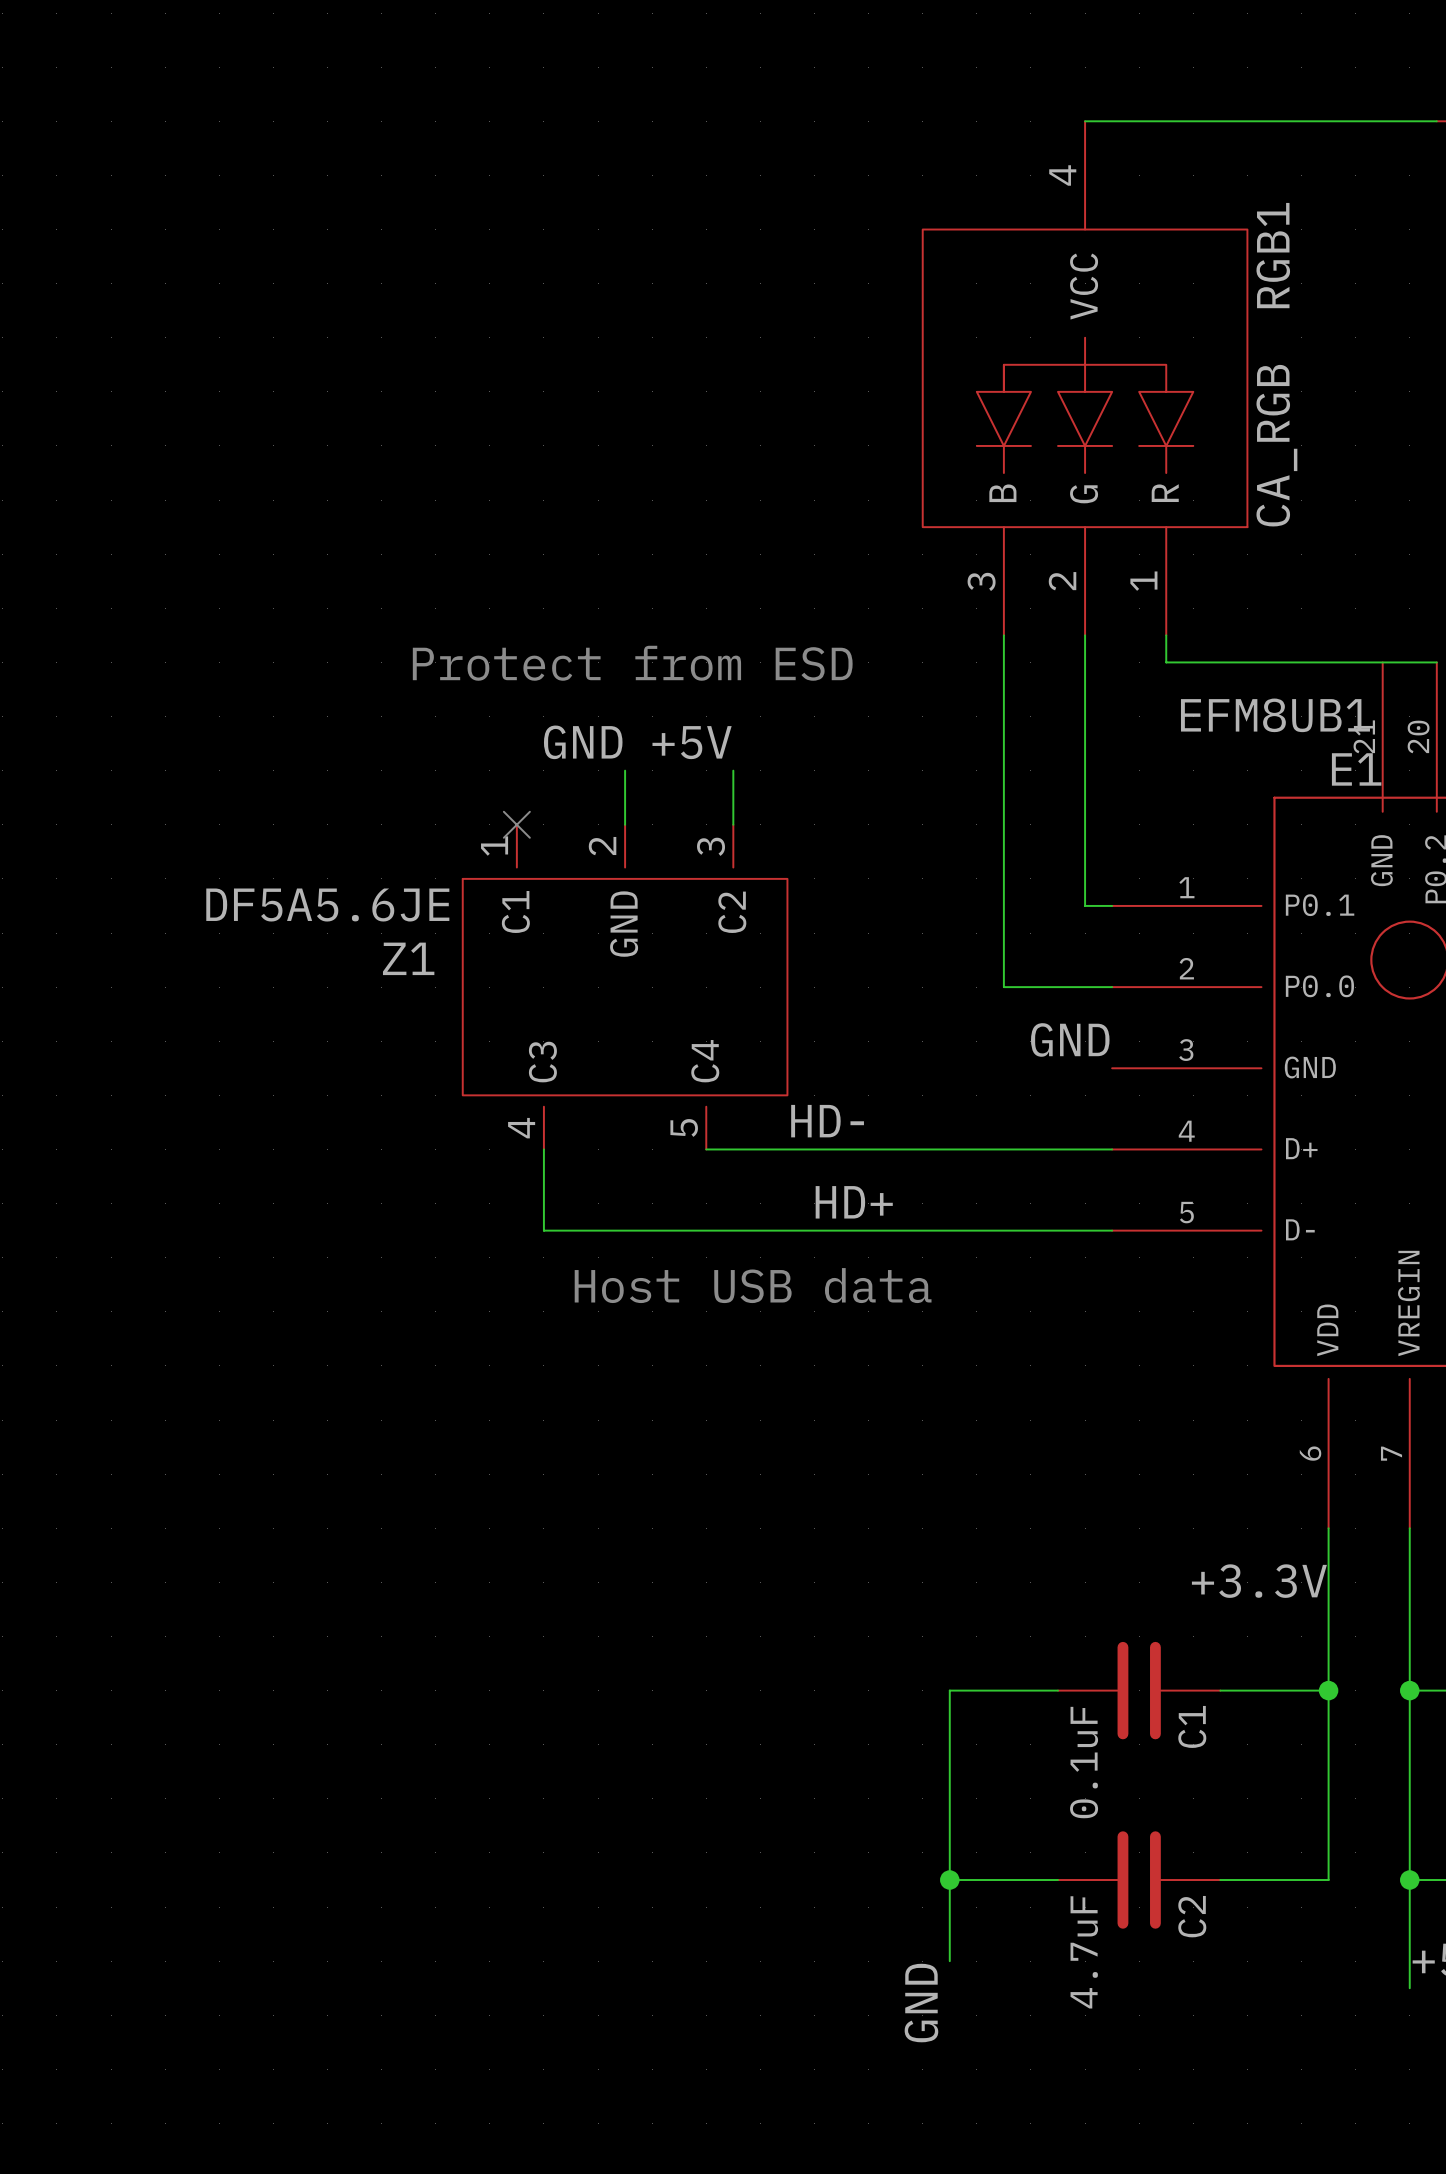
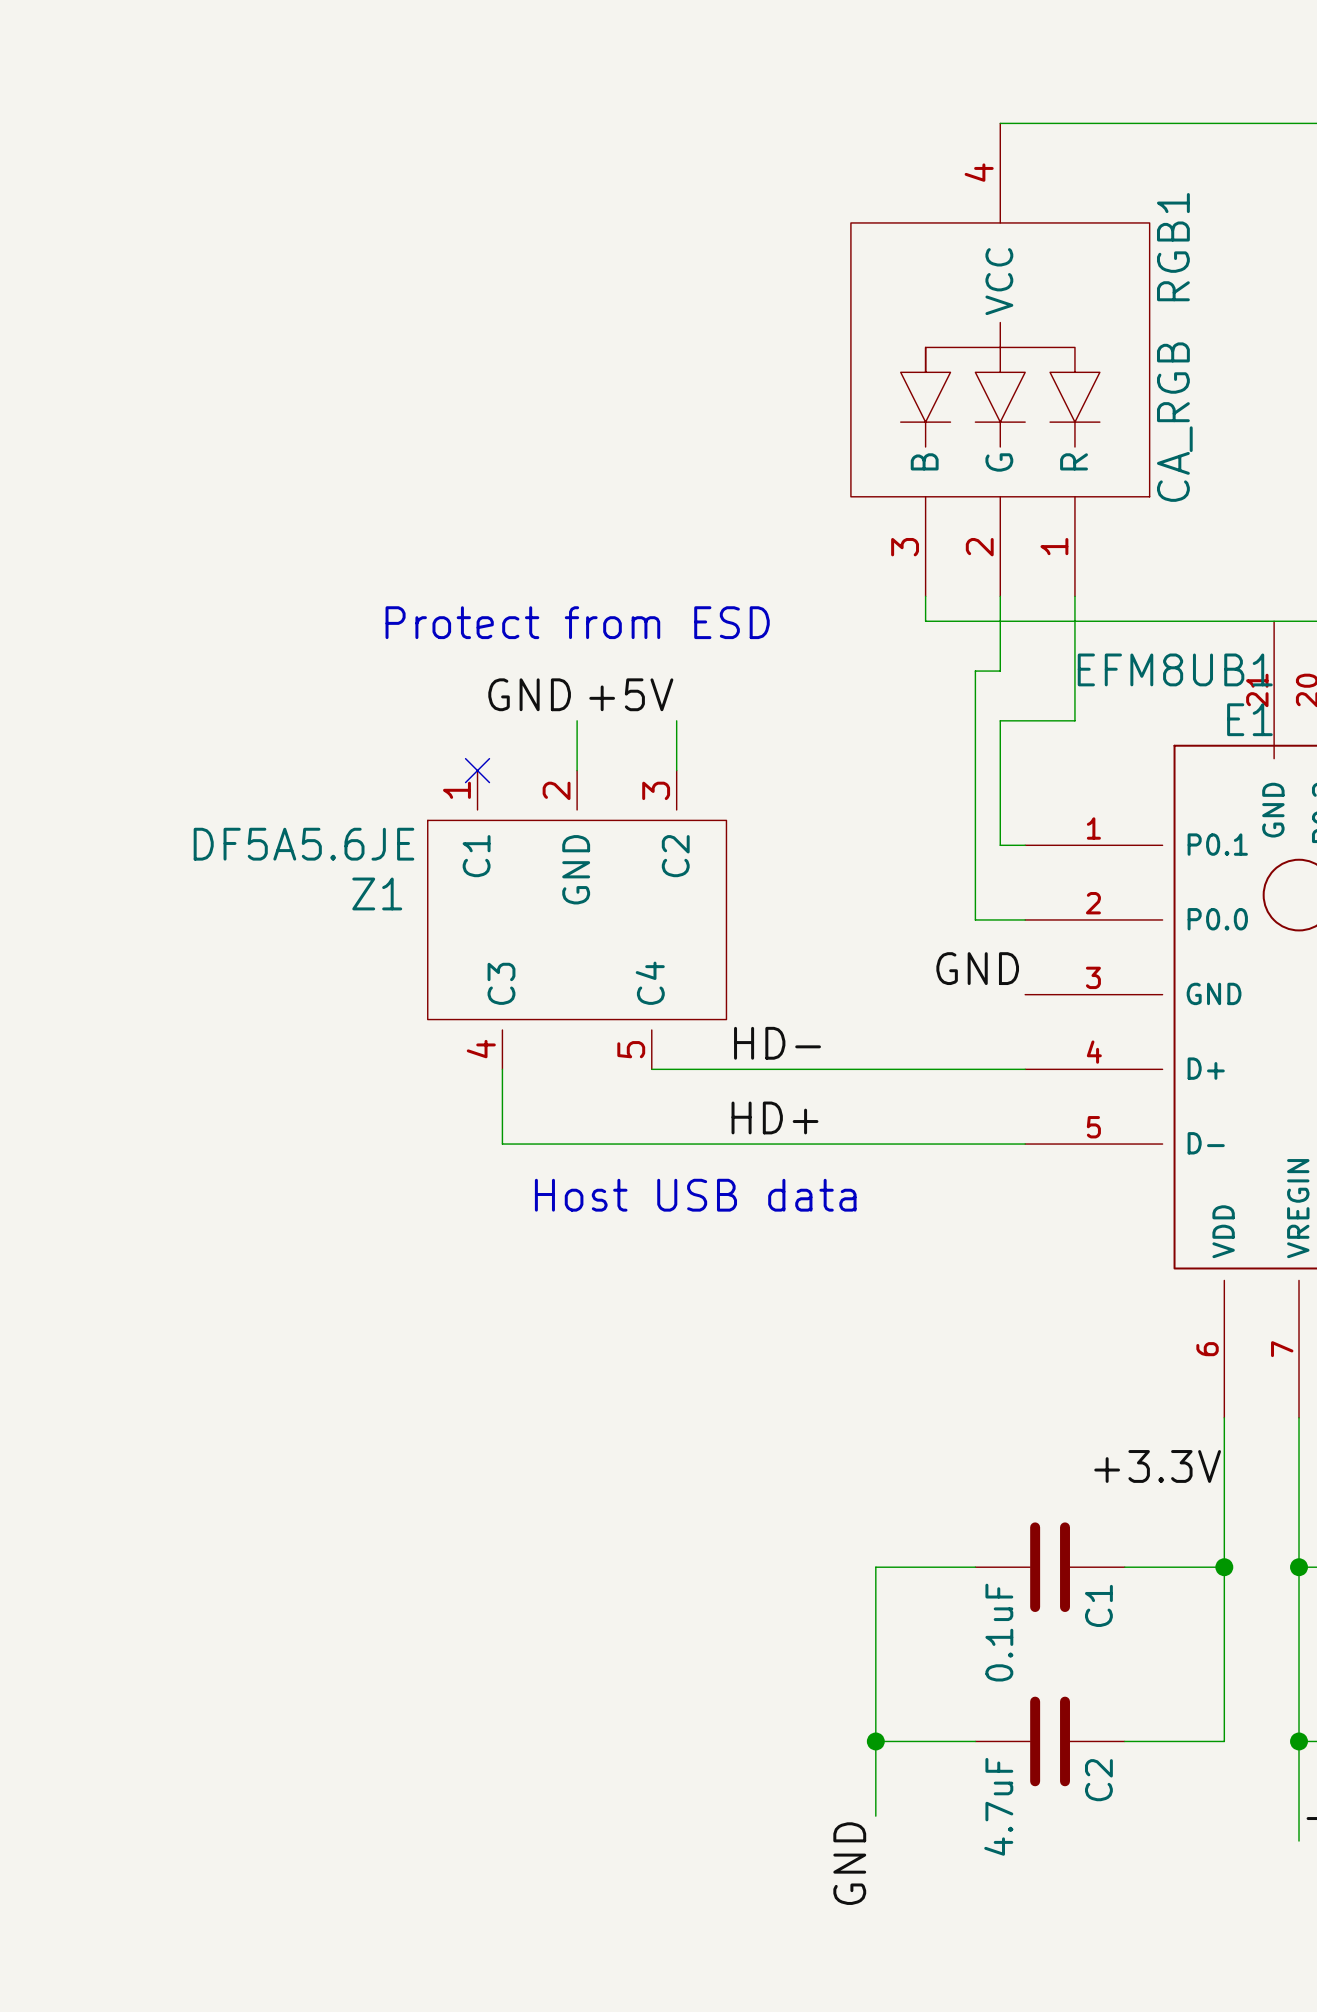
wire: (1003, 662) (1003, 987) (1058, 987) -> (1000, 671) (975, 671) (975, 919)
wire: (1085, 716) (1085, 770) -> (925, 621) (1074, 621) (1074, 720) (1000, 720)

